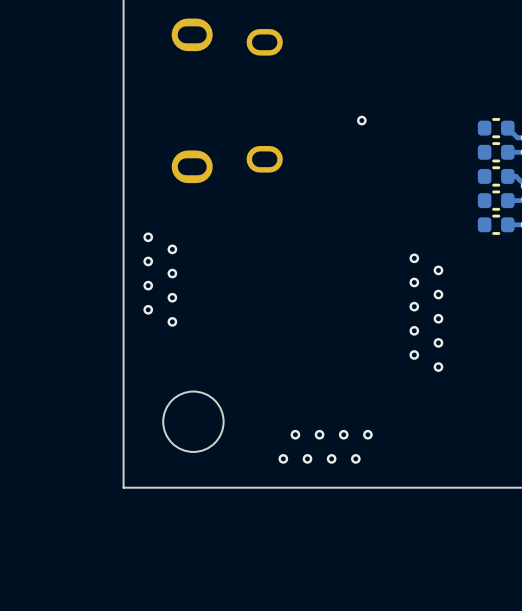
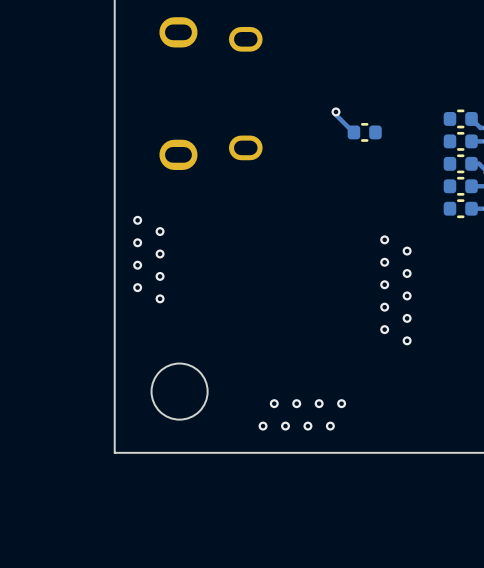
track: none -> (335, 111) (335, 114) (351, 130)
part: none -> (364, 132)

